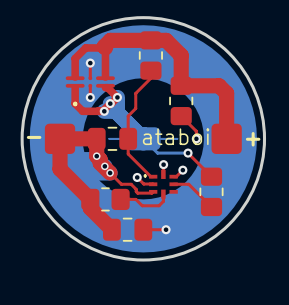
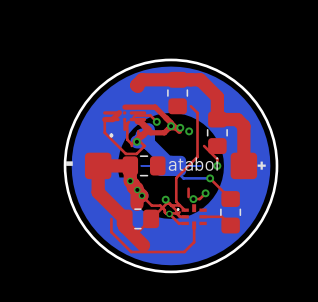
top track: (166, 40) (181, 55) (181, 85) (196, 85) -> (190, 79) (200, 79) (217, 97) (217, 119)
top track: (90, 63) (90, 78) -> none
via: (90, 63) -> none
top track: (150, 70) (150, 78) (135, 93) (135, 108) (128, 116) (128, 153) (150, 176) (153, 176) -> none
top track: none -> (190, 106) (197, 112) (197, 156) (176, 178) (176, 201) (185, 210)
top track: none -> (124, 107) (155, 107) (179, 131)
top track: (75, 77) (75, 58) (85, 47) (105, 47) (105, 77) -> none
top track: none -> (119, 112) (112, 119) (104, 119) (104, 132) (125, 153) (136, 153) (144, 146) (138, 139) (138, 131)
top track: none -> (133, 117) (150, 115) (156, 121)
top track: (75, 87) (75, 103) (82, 111) (104, 111) -> none
top track: none -> (128, 121) (127, 139) (131, 145)
via: none -> (156, 121)
top track: none -> (171, 122) (171, 126) (164, 132) (150, 132) (143, 125)
via: none -> (171, 126)
via: none -> (180, 127)
via: (90, 97) -> none
via: (117, 97) -> none
via: none -> (189, 131)
part position: (181, 100) -> (217, 132)
via: (110, 103) -> none
top track: none -> (137, 188) (137, 204)
via: (163, 164) -> none
via: none -> (193, 199)
part position: (160, 184) -> (191, 216)
top track: (173, 184) (188, 184) (201, 197) -> (203, 216) (221, 216)
top track: none -> (169, 213) (178, 223) (185, 223)
via: none -> (169, 213)
top track: (163, 194) (163, 201) (159, 205) (142, 205) (135, 199) (120, 199) -> none
top track: none -> (185, 216) (179, 216) (176, 210) (166, 203) (137, 232)
top track: none -> (111, 218) (111, 232) (131, 252) (184, 252) (194, 242) (194, 225)
part: (127, 229) -> none
top track: (143, 229) (166, 229) -> none
via: (166, 229) -> none

